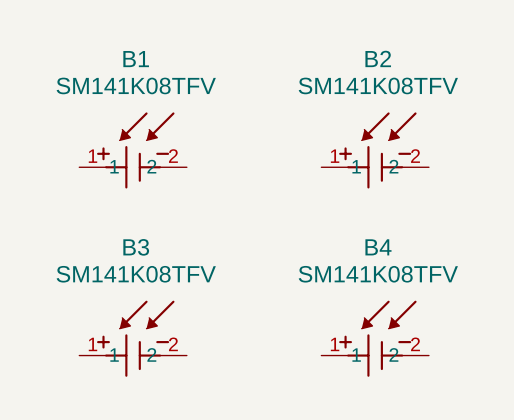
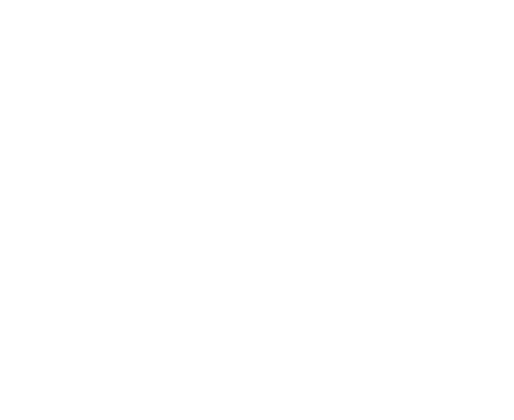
B1: SM141K08TFV (133, 150) -> none
B2: SM141K08TFV (375, 150) -> none
B3: SM141K08TFV (133, 338) -> none
B4: SM141K08TFV (375, 338) -> none

